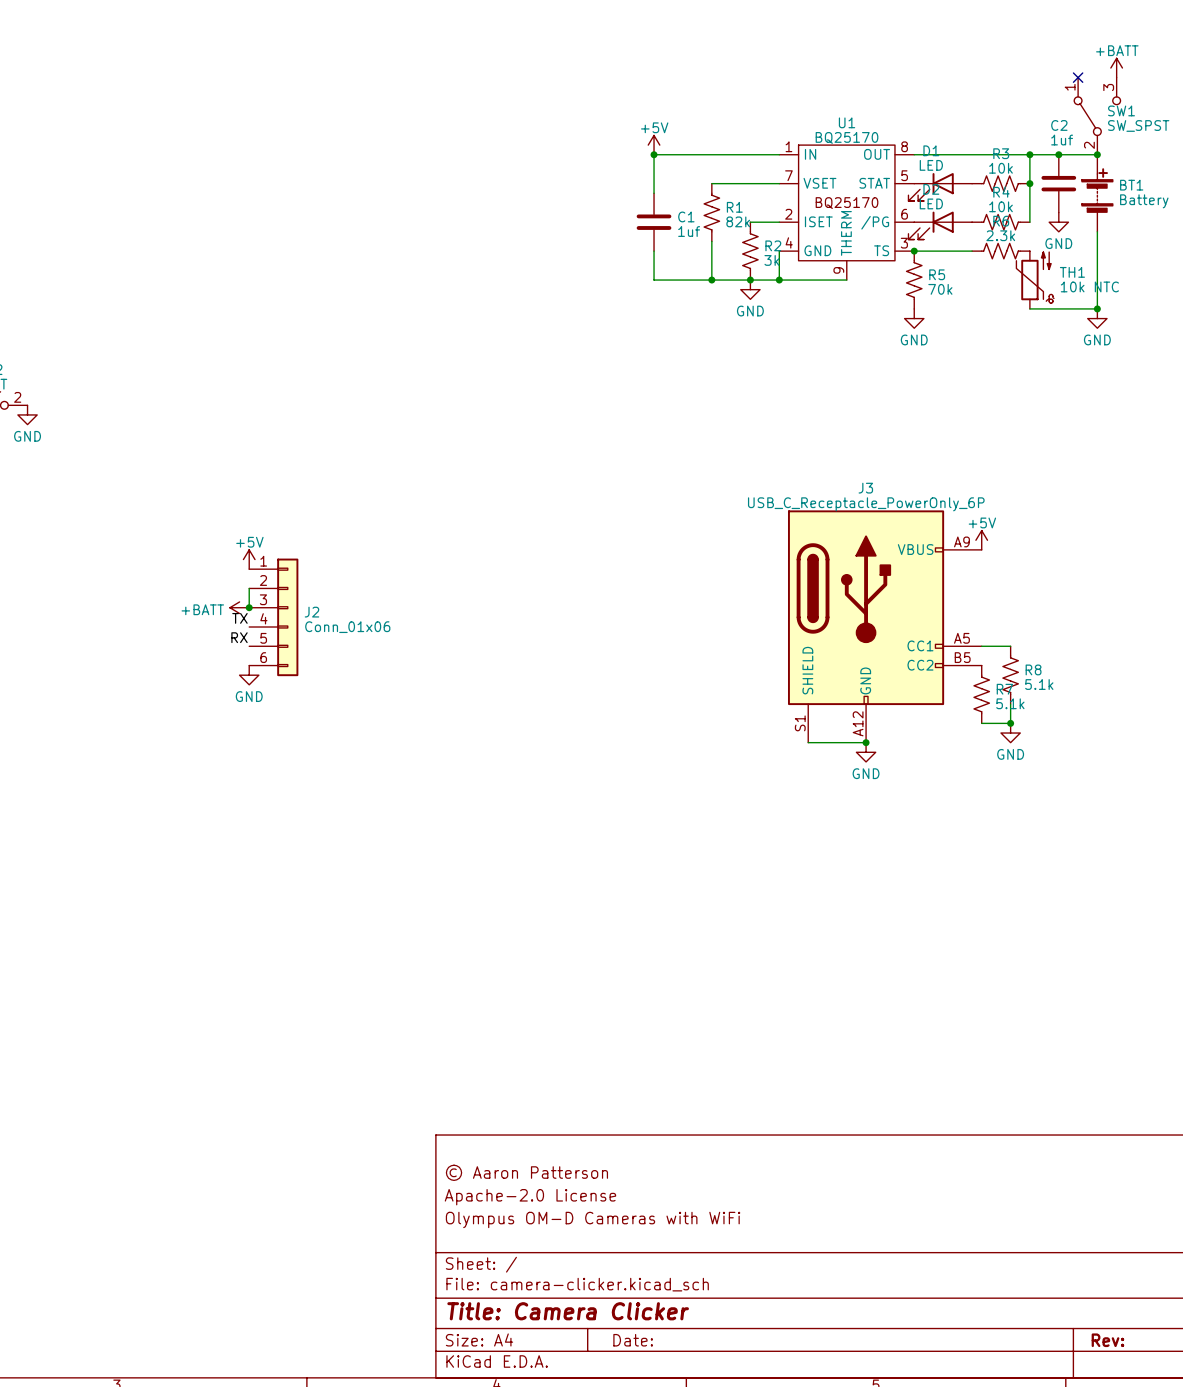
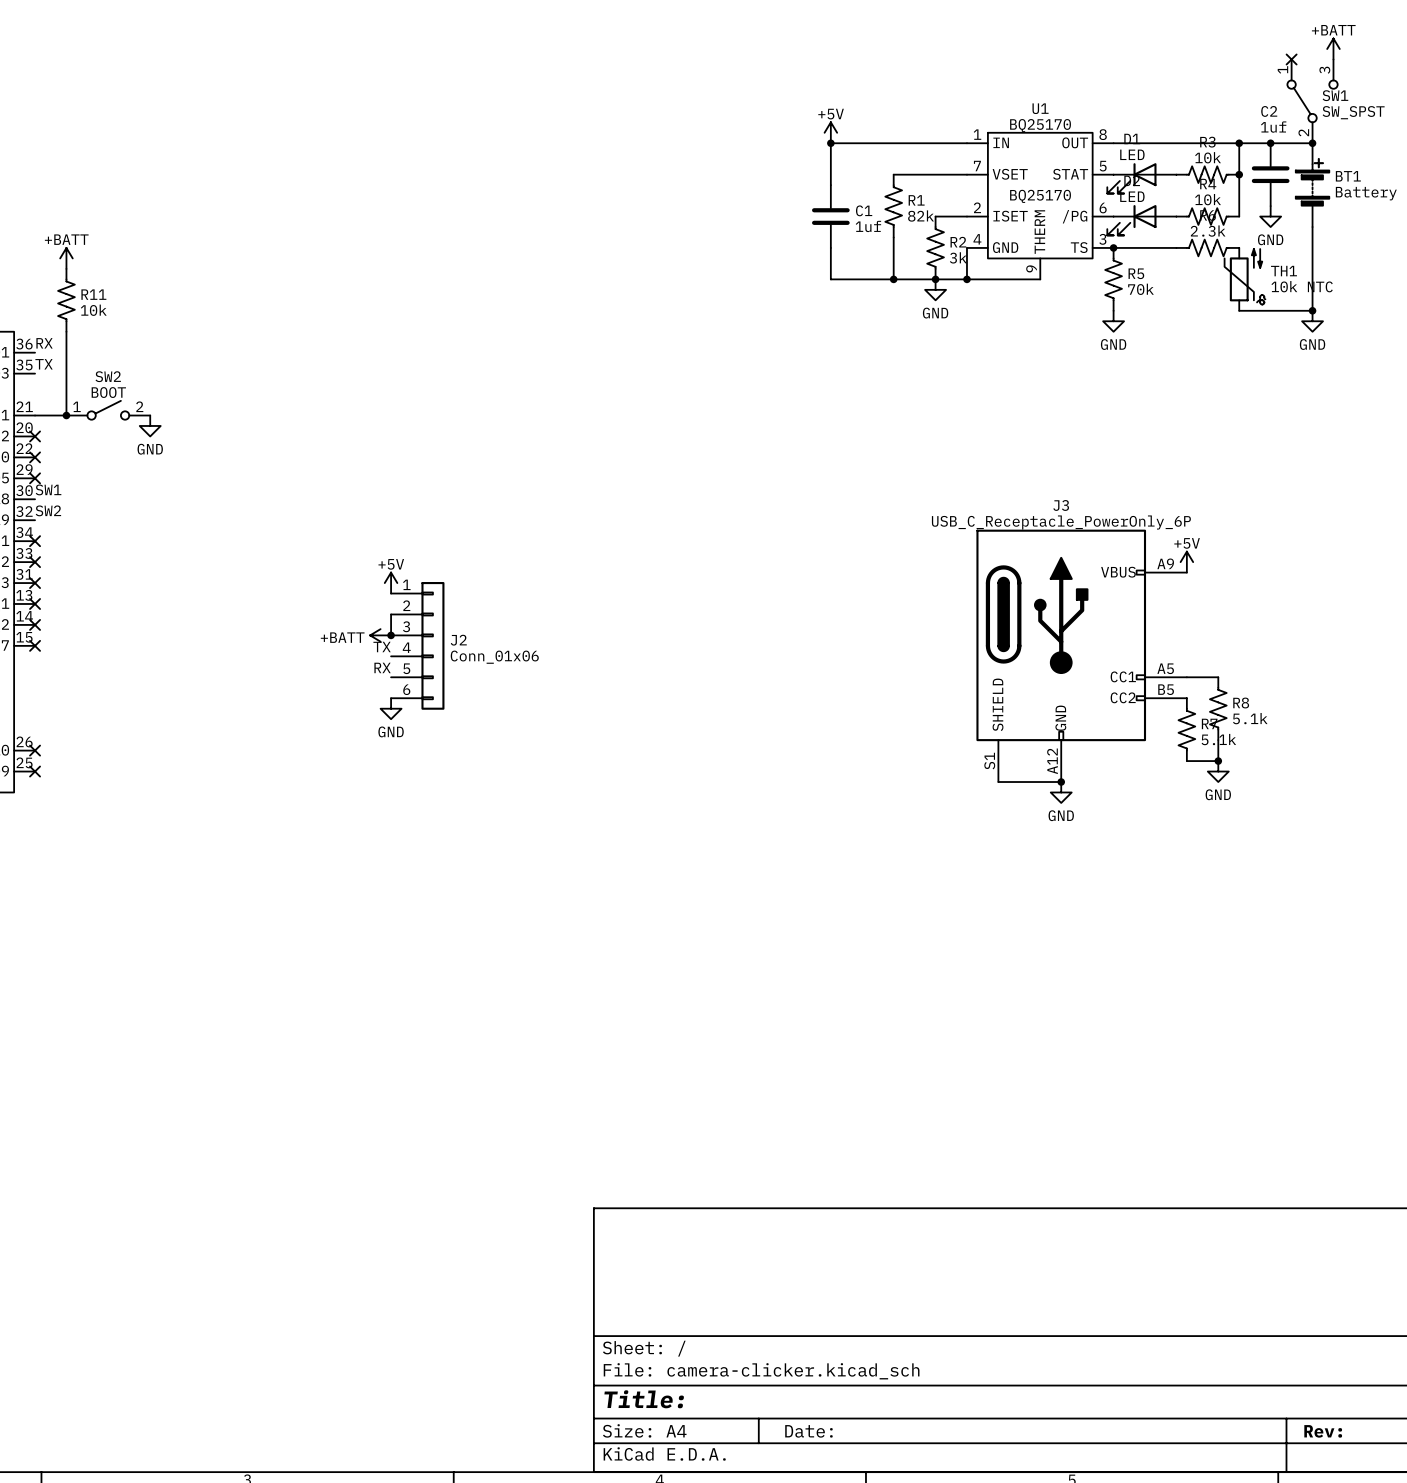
title block: © Aaron Patterson (526, 1172) -> none
title block: Apache-2.0 License (530, 1197) -> none
title block: Olympus OM-D Cameras with WiFi (593, 1219) -> none
title block: Title: Camera Clicker (568, 1311) -> Title: (644, 1399)

